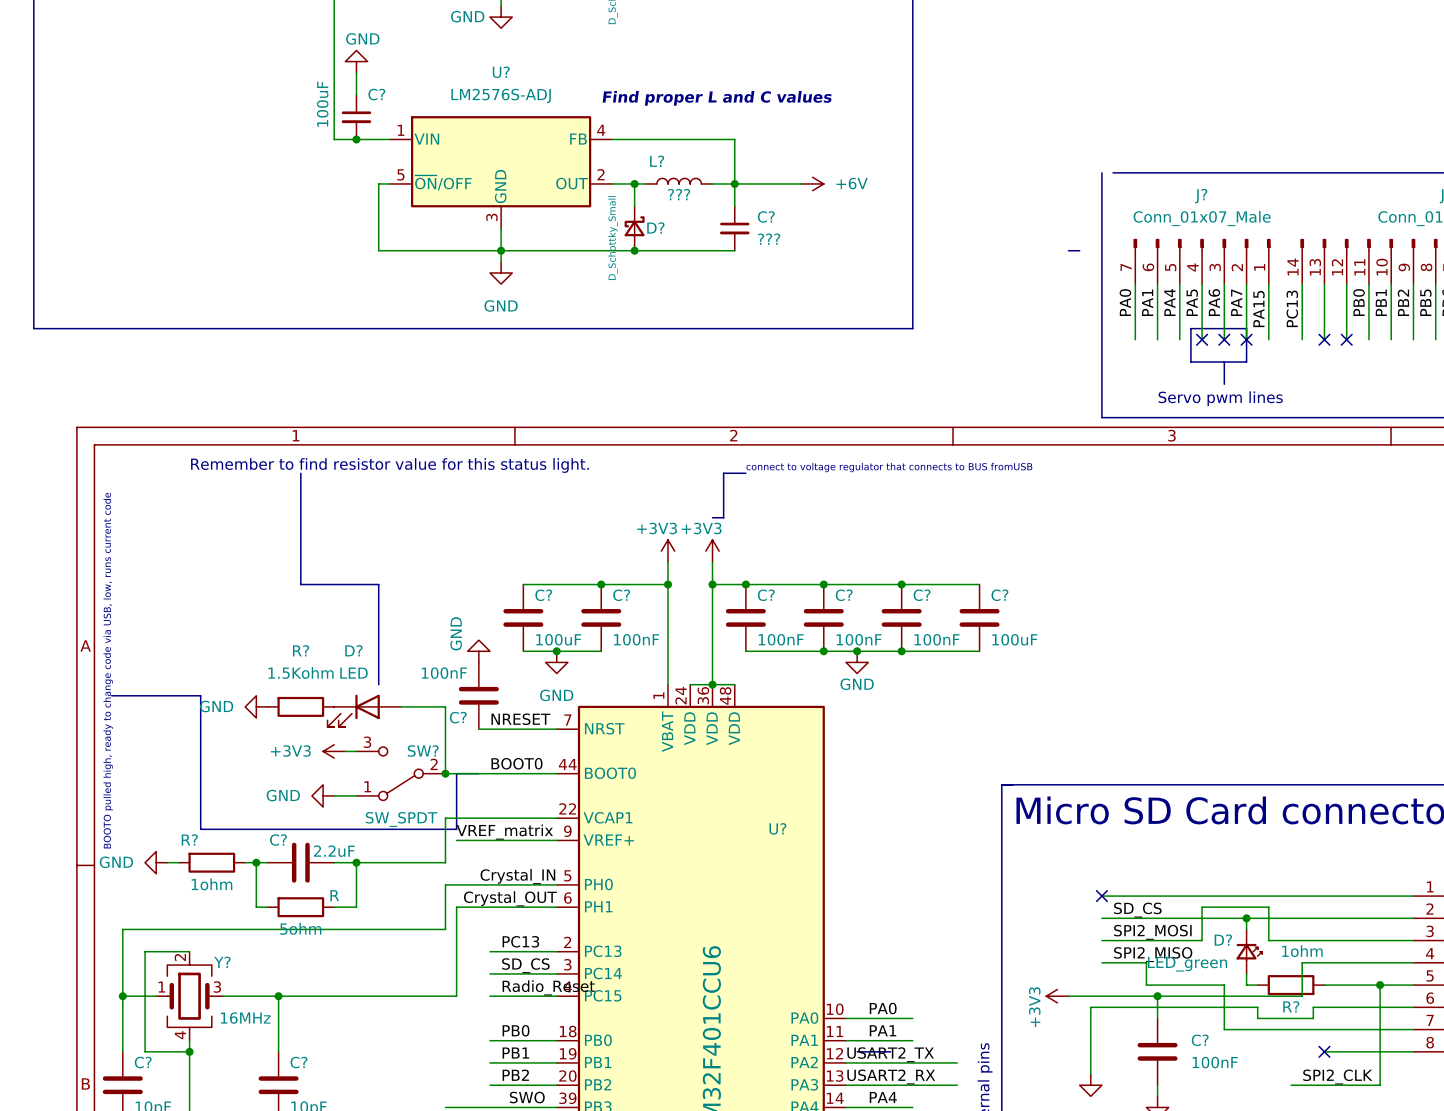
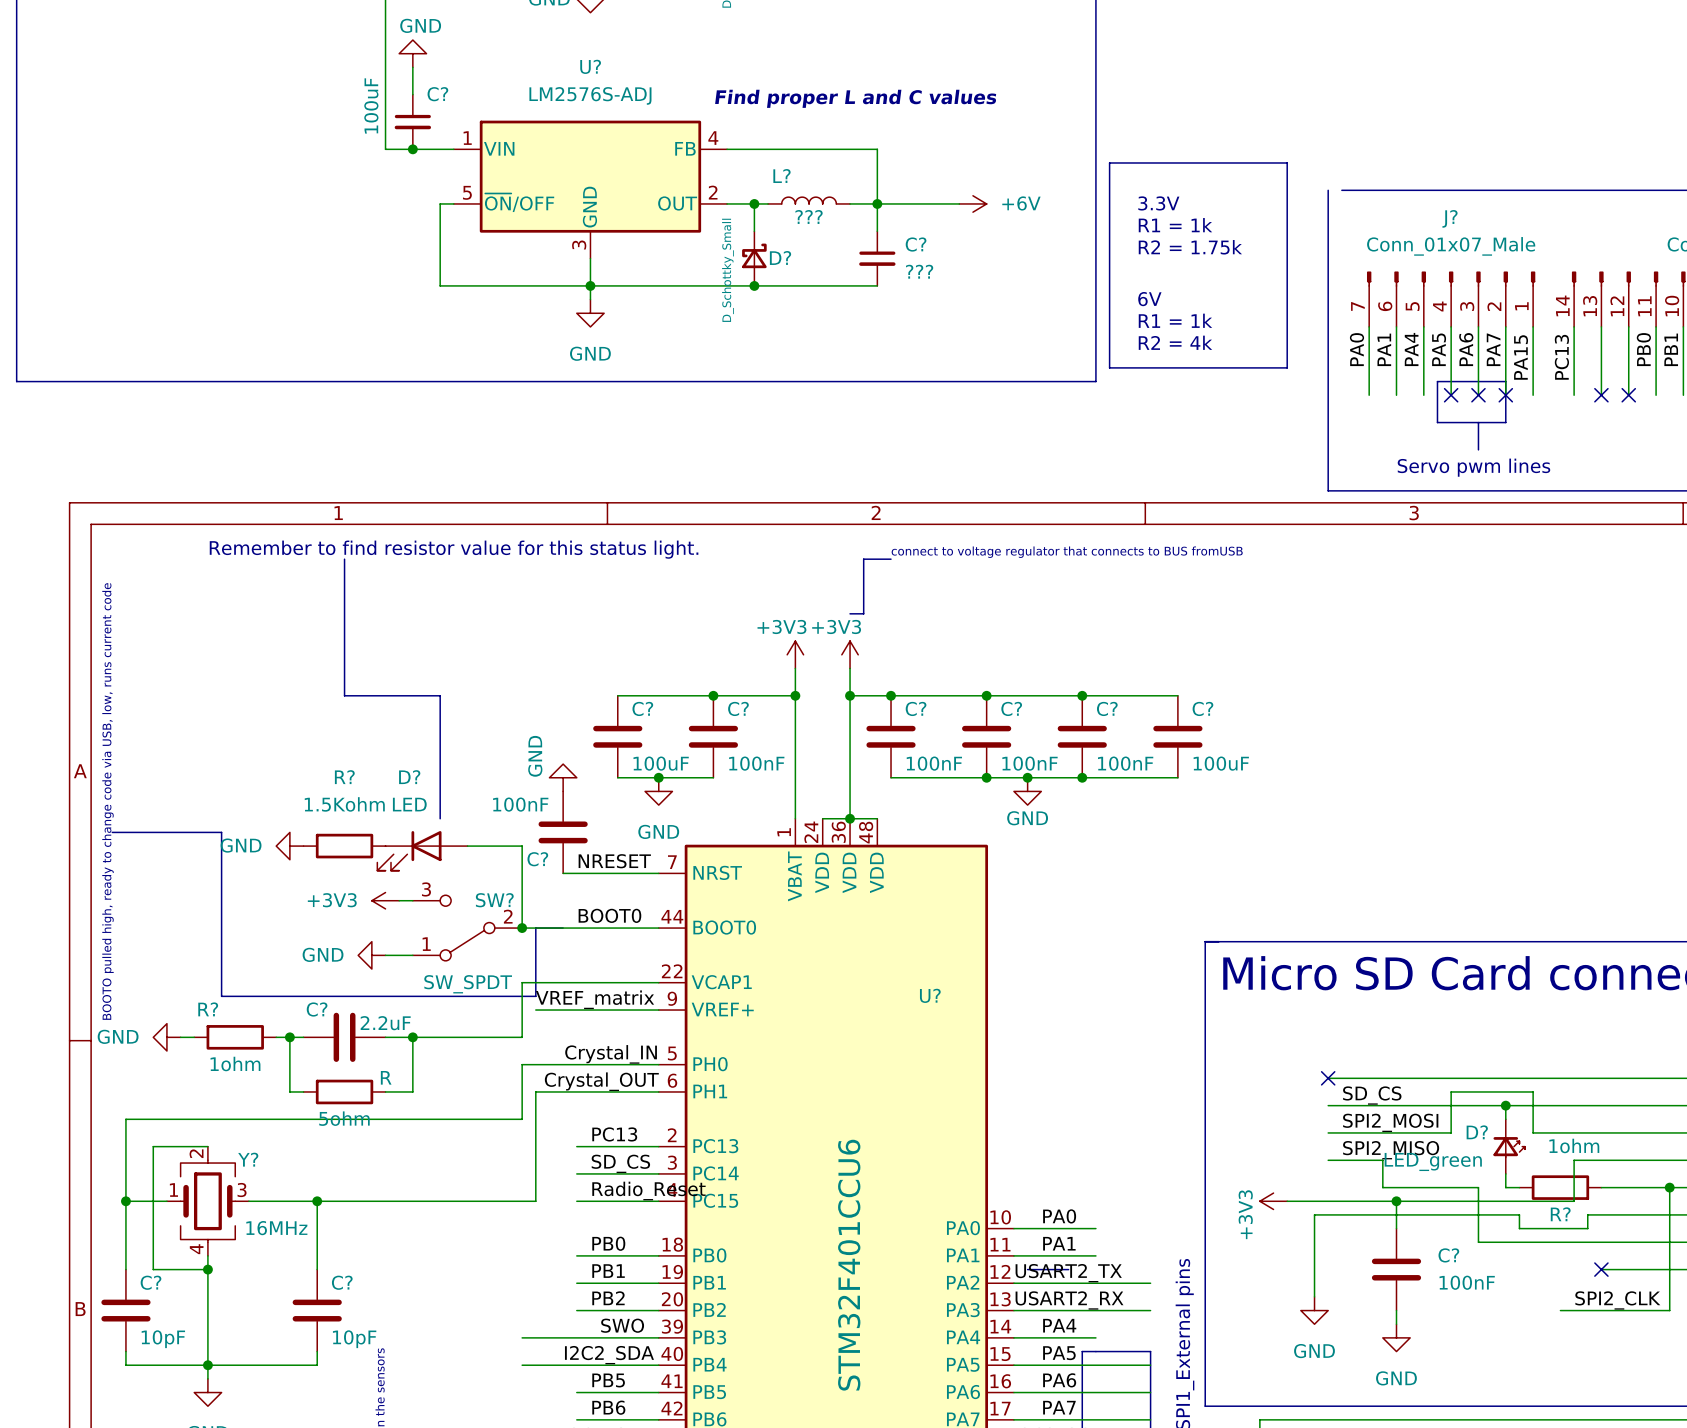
line: none -> (1109, 162) (1287, 162) (1287, 367) (1109, 367) (1109, 162)
text: none -> 3.3V (1158, 203)
text: none -> R1 = 1k (1175, 225)
text: none -> R2 = 1.75k (1190, 247)
line: (1068, 250) (1079, 250) -> none
text: none -> 6V (1149, 299)
text: none -> R1 = 1k (1175, 320)
text: none -> R2 = 4k (1175, 342)

